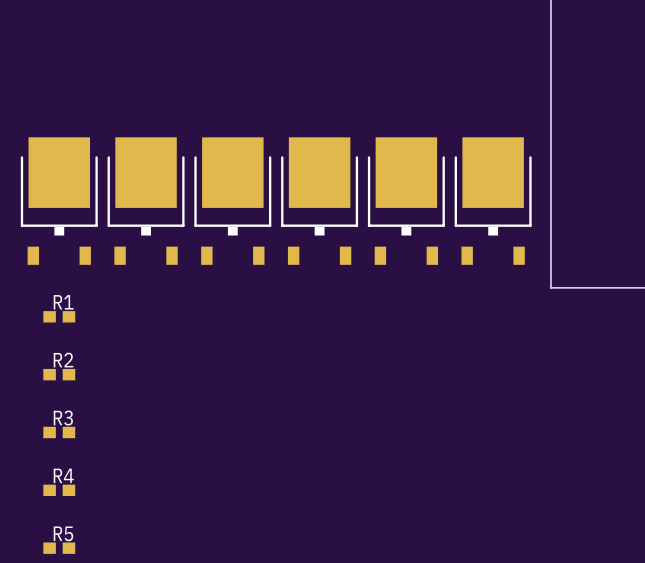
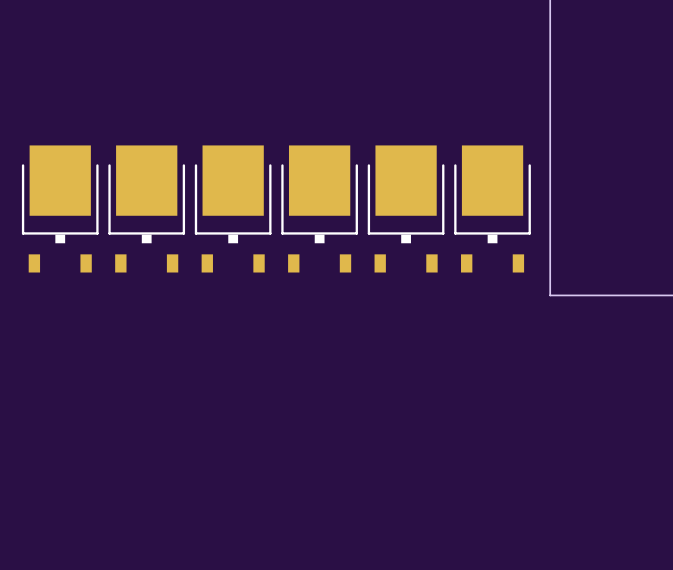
R1: (59, 316) -> none
R2: (59, 374) -> none
R3: (59, 432) -> none
R4: (59, 490) -> none
R5: (59, 548) -> none

